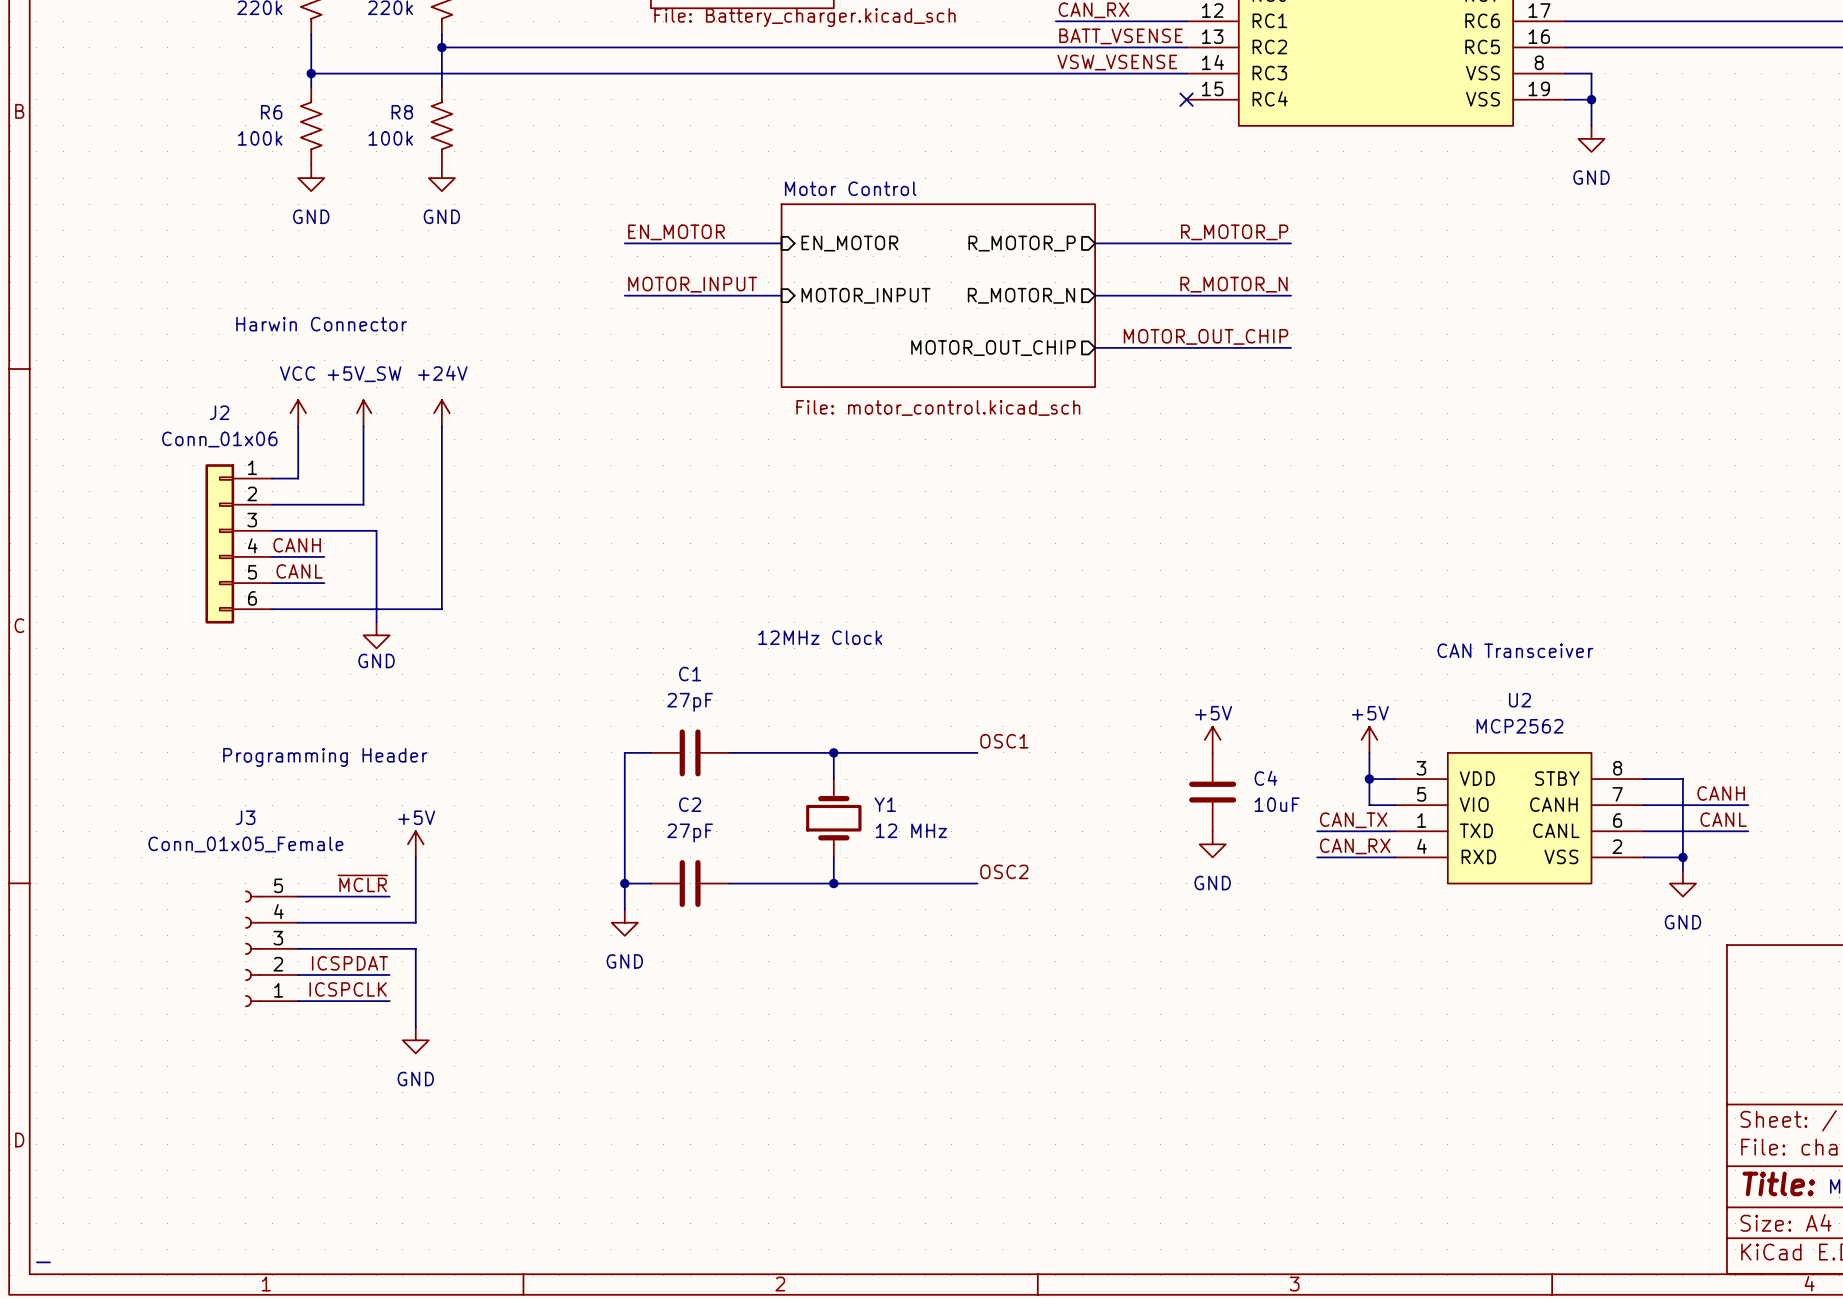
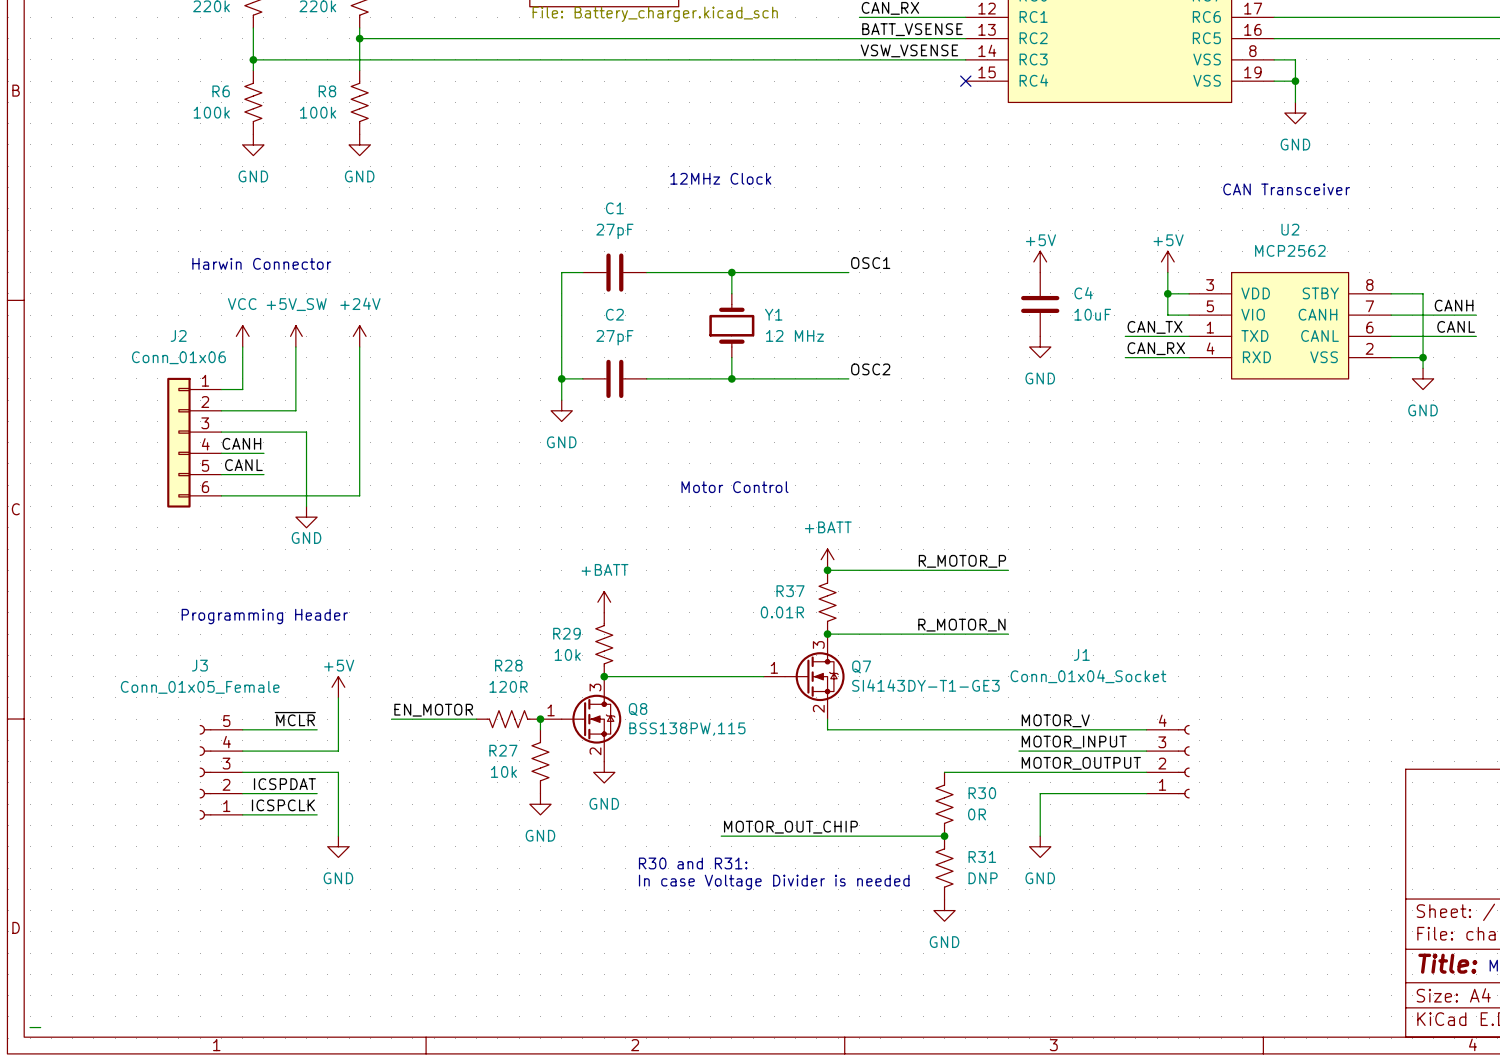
text: none -> 12MHz Clock (720, 178)
label: EN_MOTOR (676, 232) -> none
label: R_MOTOR_P (1234, 232) -> none
text: none -> CAN Transceiver (1286, 189)
wire: (624, 243) (781, 243) -> none
sheet pin: EN_MOTOR (849, 243) -> none
sheet pin: R_MOTOR_P (1022, 243) -> none
wire: (1095, 243) (1291, 243) -> none
label: MOTOR_INPUT (692, 284) -> none
label: R_MOTOR_N (1234, 284) -> none
wire: (624, 295) (781, 295) -> none
sheet pin: MOTOR_INPUT (866, 295) -> none
sheet Motor Control: File: motor_control.kicad_sch (938, 295) -> none
sheet pin: R_MOTOR_N (1021, 295) -> none
wire: (1095, 295) (1291, 295) -> none
power symbol: none -> +5V (1040, 261)
power symbol: none -> +5V (1167, 261)
label: none -> OSC1 (870, 263)
wire: none -> (582, 272) (561, 272) (561, 400)
wire: none -> (646, 272) (848, 272)
wire: none -> (731, 272) (731, 293)
junction: none -> (731, 272)
wire: none -> (1167, 272) (1167, 315) (1189, 315)
label: MOTOR_OUT_CHIP (1206, 336) -> none
wire: (1095, 347) (1291, 347) -> none
sheet pin: MOTOR_OUT_CHIP (993, 348) -> none
wire: none -> (1167, 293) (1189, 293)
junction: none -> (1167, 293)
wire: none -> (1391, 293) (1423, 293) (1423, 368)
label: none -> CANH (1454, 305)
wire: none -> (1391, 315) (1476, 315)
label: none -> CANL (1456, 326)
label: none -> CAN_TX (1155, 327)
wire: none -> (1125, 336) (1189, 336)
wire: none -> (1391, 336) (1476, 336)
power symbol: none -> GND (1040, 347)
label: none -> CAN_RX (1156, 348)
wire: none -> (731, 357) (731, 378)
wire: none -> (1125, 357) (1189, 357)
wire: none -> (1391, 357) (1423, 357)
junction: none -> (1423, 357)
label: none -> OSC2 (870, 369)
wire: none -> (561, 378) (582, 378)
junction: none -> (561, 378)
wire: none -> (646, 378) (848, 378)
junction: none -> (731, 378)
power symbol: none -> GND (1423, 378)
power symbol: none -> GND (561, 410)
text: none -> Motor Control (734, 487)
text: 12MHz Clock (820, 637) -> none
text: CAN Transceiver (1515, 650) -> none
power symbol: none -> +BATT (827, 559)
label: none -> R_MOTOR_P (962, 561)
wire: none -> (827, 570) (1008, 570)
junction: none -> (827, 570)
power symbol: none -> +BATT (604, 602)
R37: none -> 0.01R (827, 602)
power symbol: +5V (1212, 739) -> none
power symbol: +5V (1369, 739) -> none
label: OSC1 (1004, 741) -> none
wire: (650, 752) (624, 752) (624, 909) -> none
C1 position: (690, 752) -> (614, 272)
wire: (729, 752) (977, 752) -> none
wire: (833, 752) (833, 779) -> none
junction: (833, 752) -> none
wire: (1369, 752) (1369, 805) (1395, 805) -> none
label: none -> R_MOTOR_N (961, 625)
wire: none -> (827, 634) (1008, 634)
junction: none -> (827, 634)
wire: (1369, 779) (1395, 779) -> none
junction: (1369, 779) -> none
wire: (1643, 779) (1682, 779) (1682, 870) -> none
R29: none -> 10k (604, 644)
C4 position: (1212, 792) -> (1040, 304)
label: CANH (1721, 793) -> none
wire: (1643, 805) (1748, 805) -> none
Y1 position: (833, 818) -> (731, 325)
U2 position: (1519, 818) -> (1290, 325)
label: CANL (1723, 819) -> none
label: CAN_TX (1353, 820) -> none
wire: none -> (604, 676) (763, 676)
junction: none -> (604, 676)
Q7: none -> SI4143DY-T1-GE3 (804, 676)
wire: (1317, 831) (1395, 831) -> none
wire: (1643, 831) (1748, 831) -> none
power symbol: GND (1212, 844) -> none
label: CAN_RX (1355, 846) -> none
wire: (833, 857) (833, 883) -> none
wire: (1317, 857) (1395, 857) -> none
wire: (1643, 857) (1682, 857) -> none
junction: (1682, 857) -> none
label: OSC2 (1004, 871) -> none
label: none -> EN_MOTOR (433, 710)
wire: none -> (391, 719) (476, 719)
wire: (624, 883) (650, 883) -> none
junction position: (624, 883) -> (540, 719)
R28: none -> 120R (508, 719)
wire: none -> (540, 719) (540, 729)
C2 position: (690, 883) -> (614, 378)
Q8: none -> BSS138PW,115 (580, 719)
wire: (729, 883) (977, 883) -> none
junction: (833, 883) -> none
wire: none -> (827, 719) (827, 729) (1146, 729)
power symbol: GND (1682, 883) -> none
label: none -> MOTOR_V (1055, 720)
label: none -> MOTOR_INPUT (1074, 742)
power symbol: GND (624, 922) -> none
wire: none -> (1018, 751) (1146, 751)
R27: none -> 10k (540, 761)
J1: none -> Conn_01x04_Socket (1168, 761)
label: none -> MOTOR_OUTPUT (1081, 763)
power symbol: none -> GND (604, 772)
wire: none -> (944, 772) (1146, 772)
wire: none -> (1146, 793) (1040, 793) (1040, 836)
power symbol: none -> GND (540, 804)
R30: none -> 0R (944, 804)
label: none -> MOTOR_OUT_CHIP (790, 827)
wire: none -> (721, 836) (944, 836)
junction: none -> (944, 836)
power symbol: none -> GND (1040, 846)
text: none -> R30 and R31: (693, 863)
R31: none -> DNP (944, 868)
text: none -> In case Voltage Divider is needed (774, 882)
power symbol: none -> GND (944, 910)

